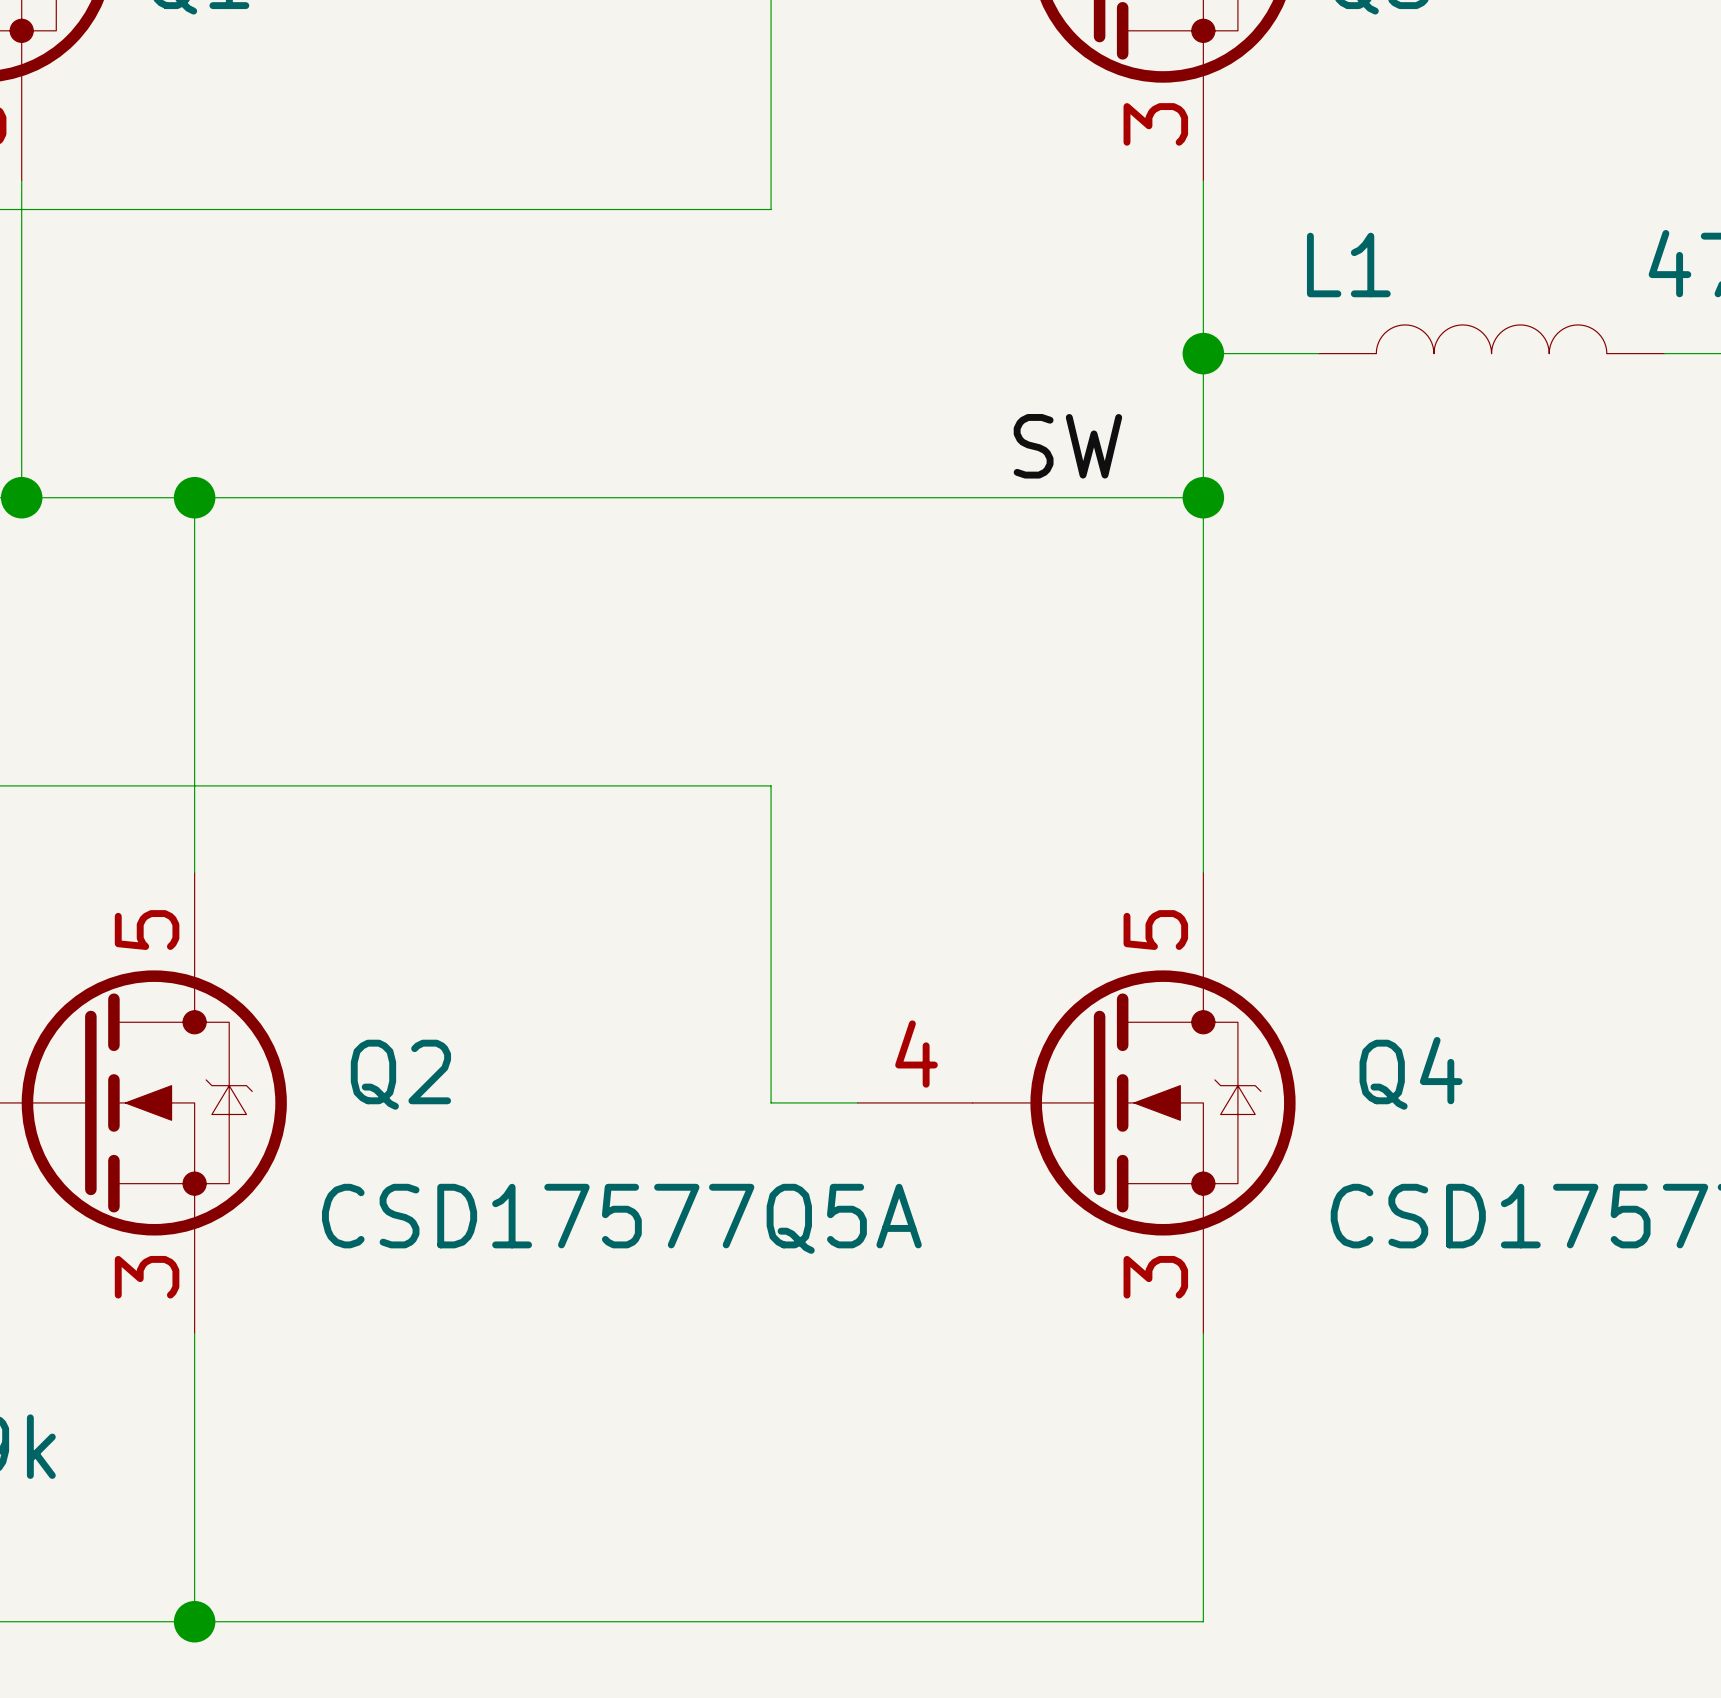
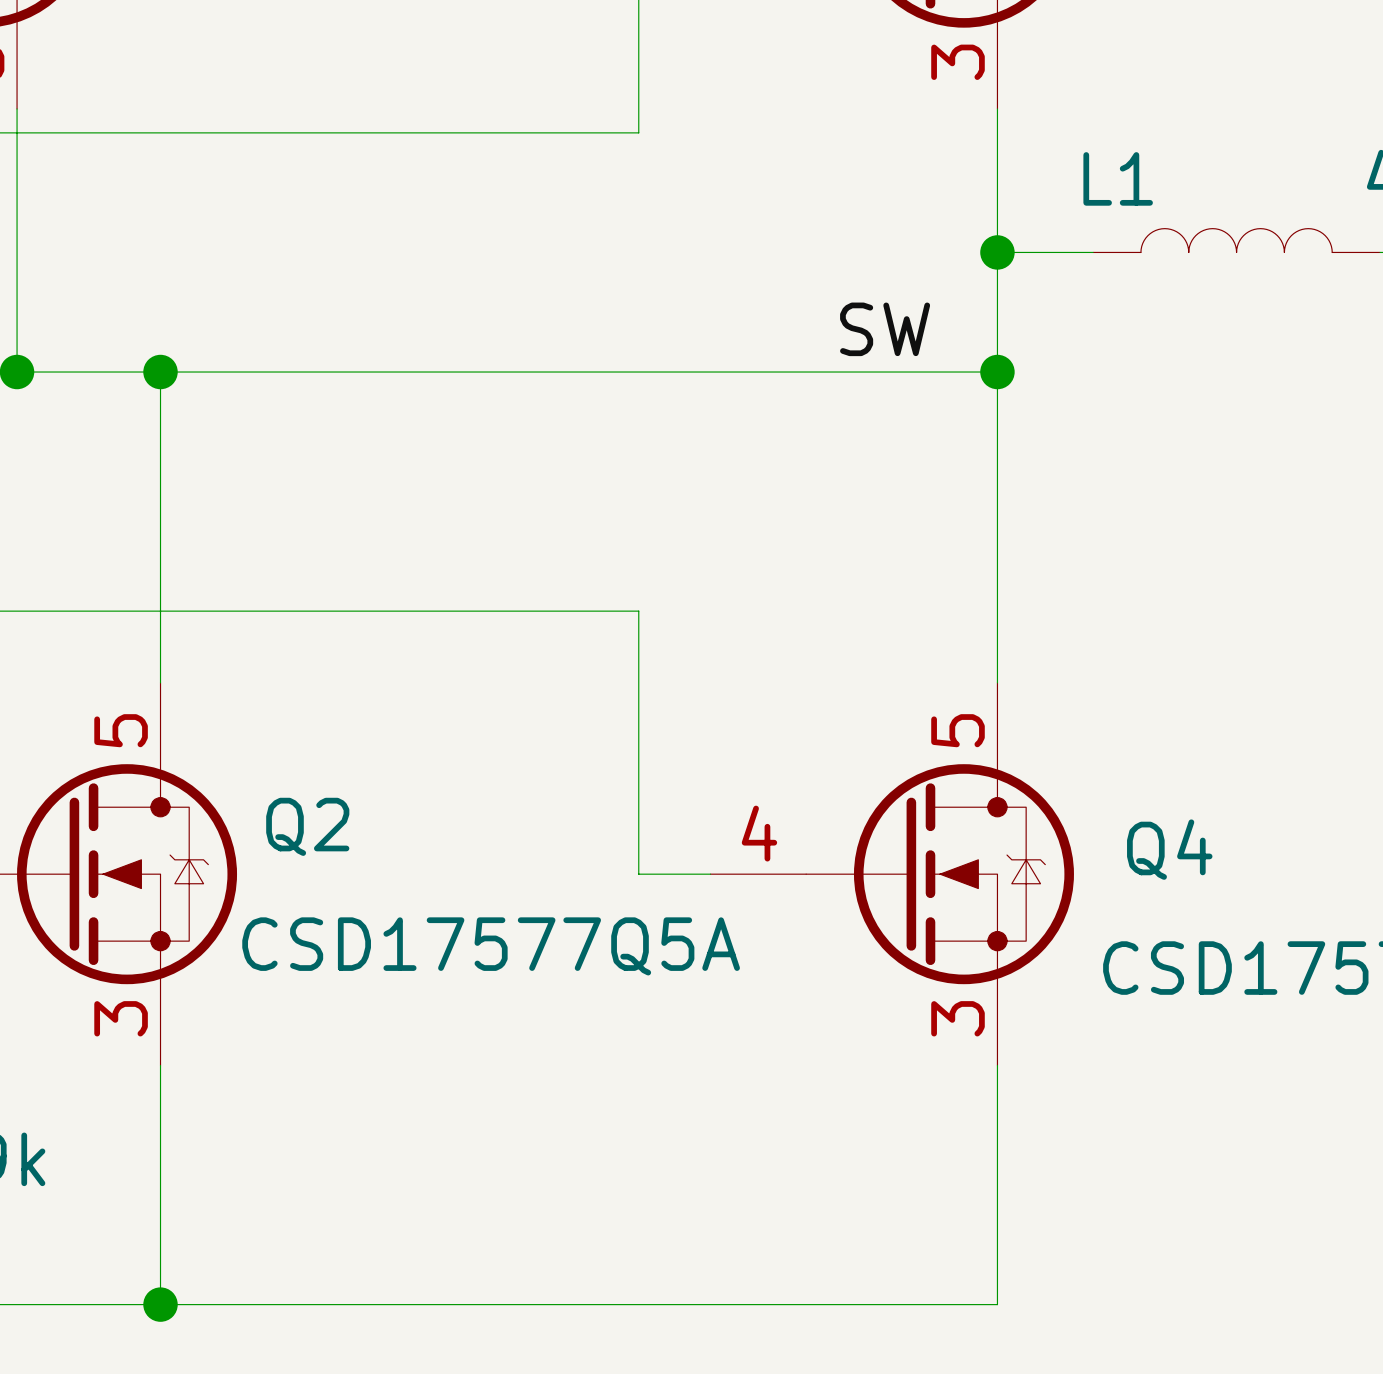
Q2 name position: Q2 (400, 1074) -> Q2 (307, 826)
Q2 value position: CSD17577Q5A (621, 1218) -> CSD17577Q5A (491, 946)

